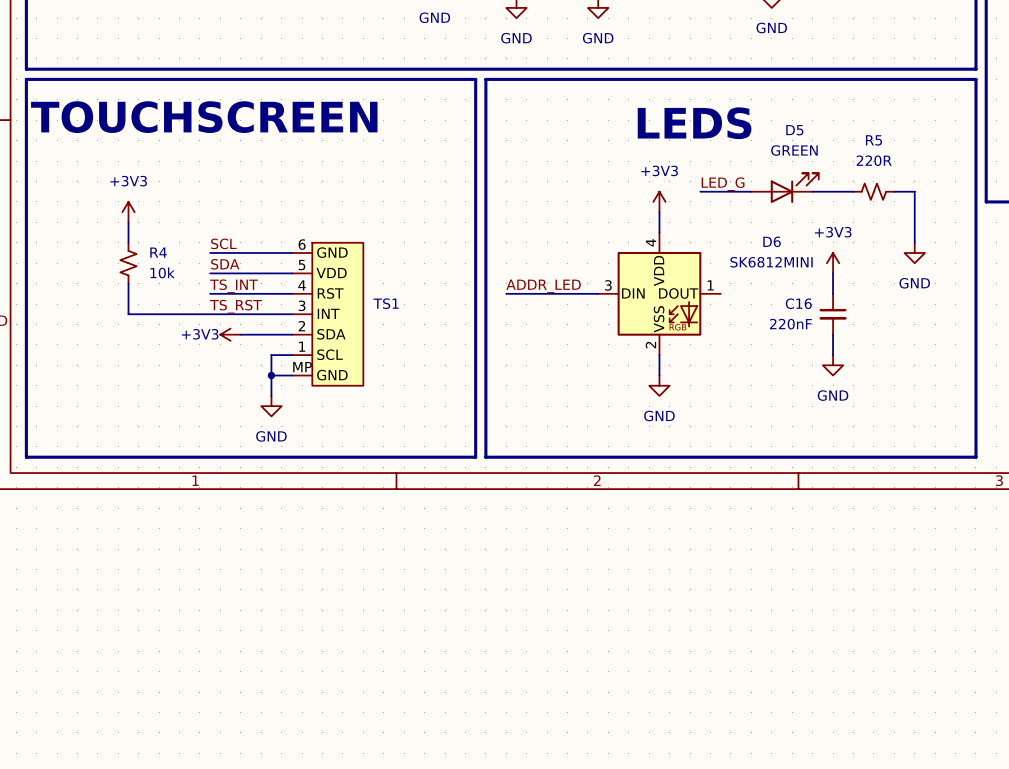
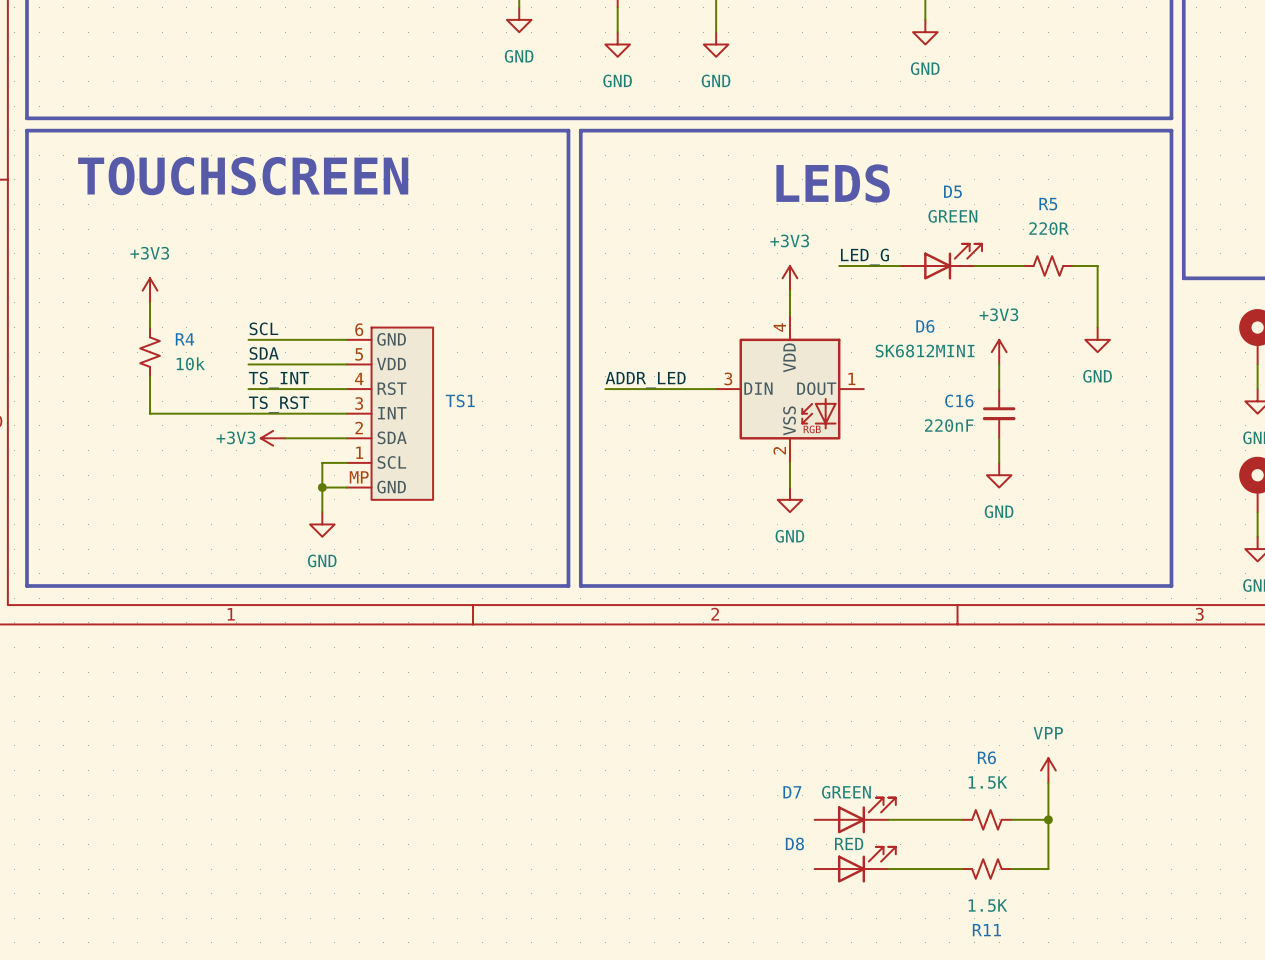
power symbol: none -> VPP (1048, 770)
wire: none -> (1048, 782) (1048, 869) (1011, 869)
D7: none -> GREEN (855, 815)
wire: none -> (888, 819) (962, 819)
R6: none -> 1.5K (986, 819)
wire: none -> (1011, 819) (1048, 819)
junction: none -> (1048, 819)
D8: none -> RED (855, 864)
wire: none -> (888, 869) (962, 869)
R11: none -> 1.5K (986, 869)

